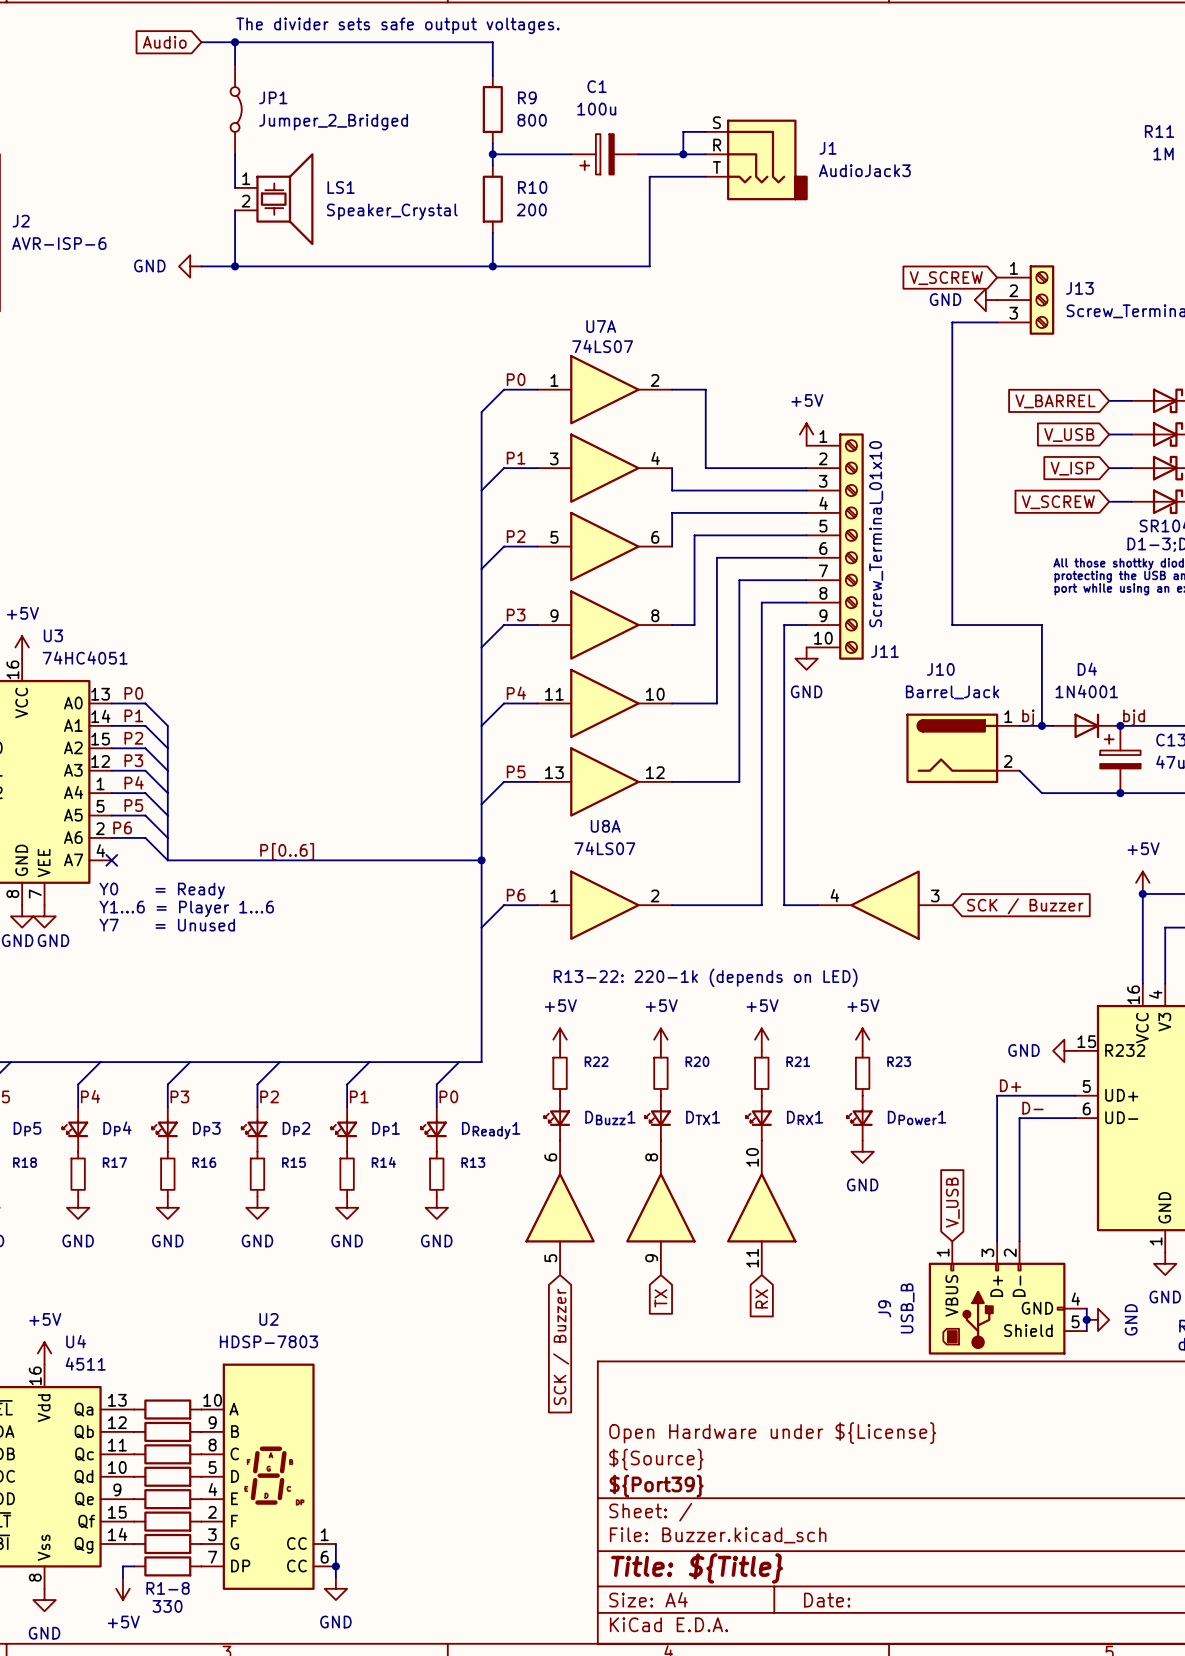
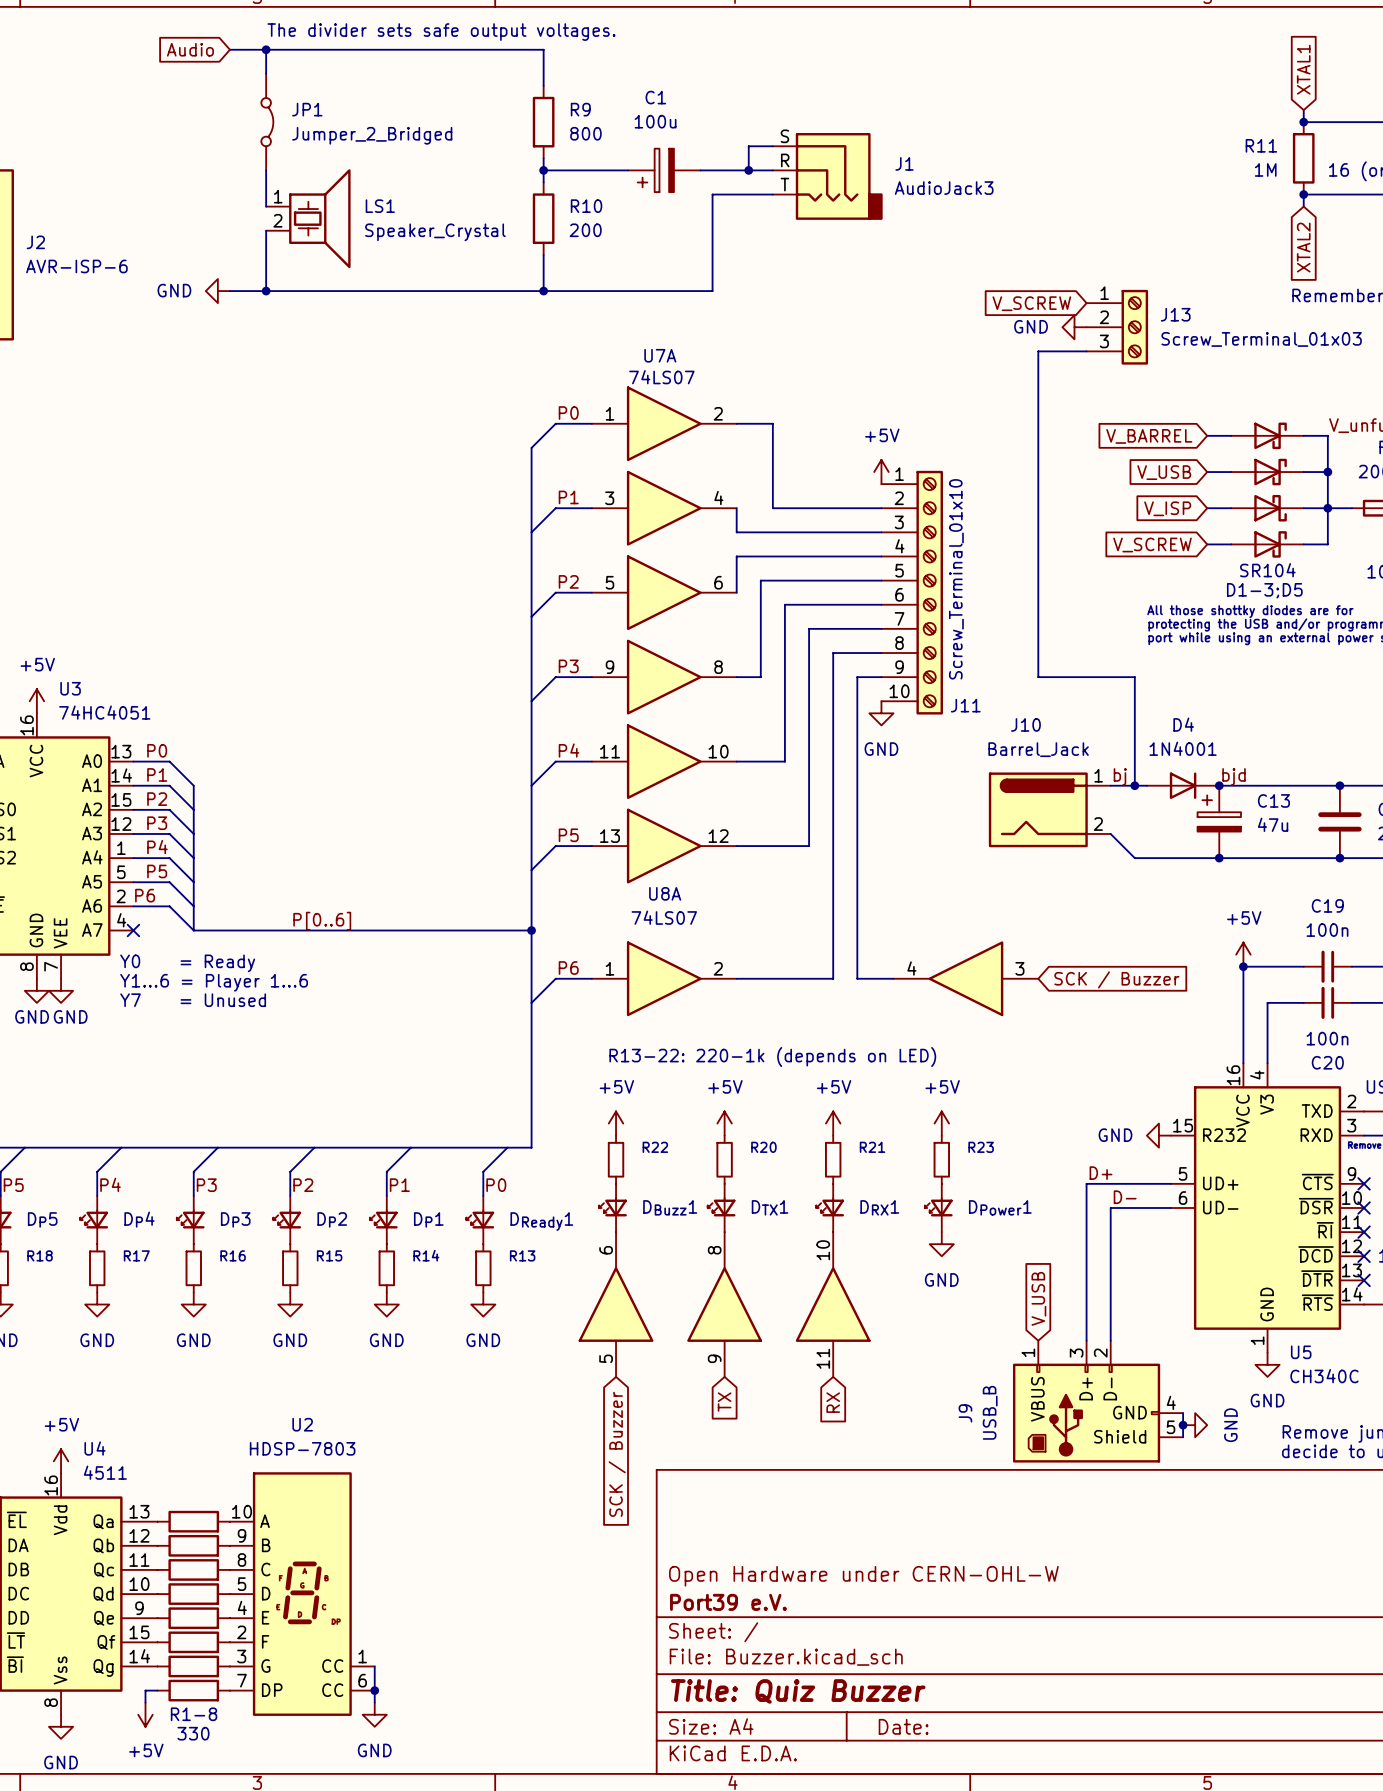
title block: Open Hardware under ${License} (772, 1433) -> none
title block: ${Source} (656, 1459) -> Open Hardware under CERN-OHL-W (863, 1576)
title block: ${Port39} (656, 1486) -> Port39 e.V. (728, 1602)
title block: Title: ${Title} (697, 1568) -> Title: Quiz Buzzer (798, 1691)

